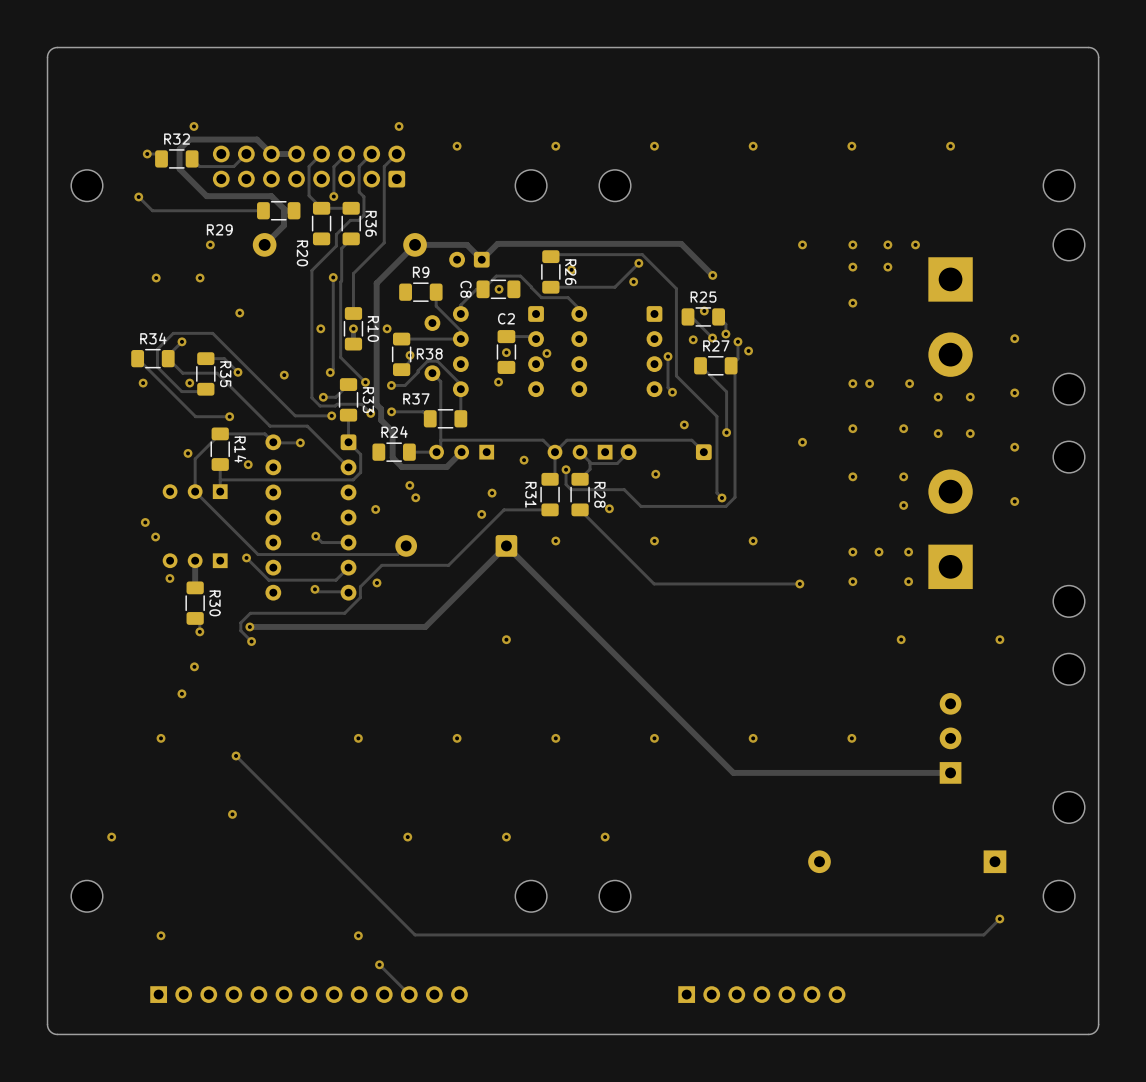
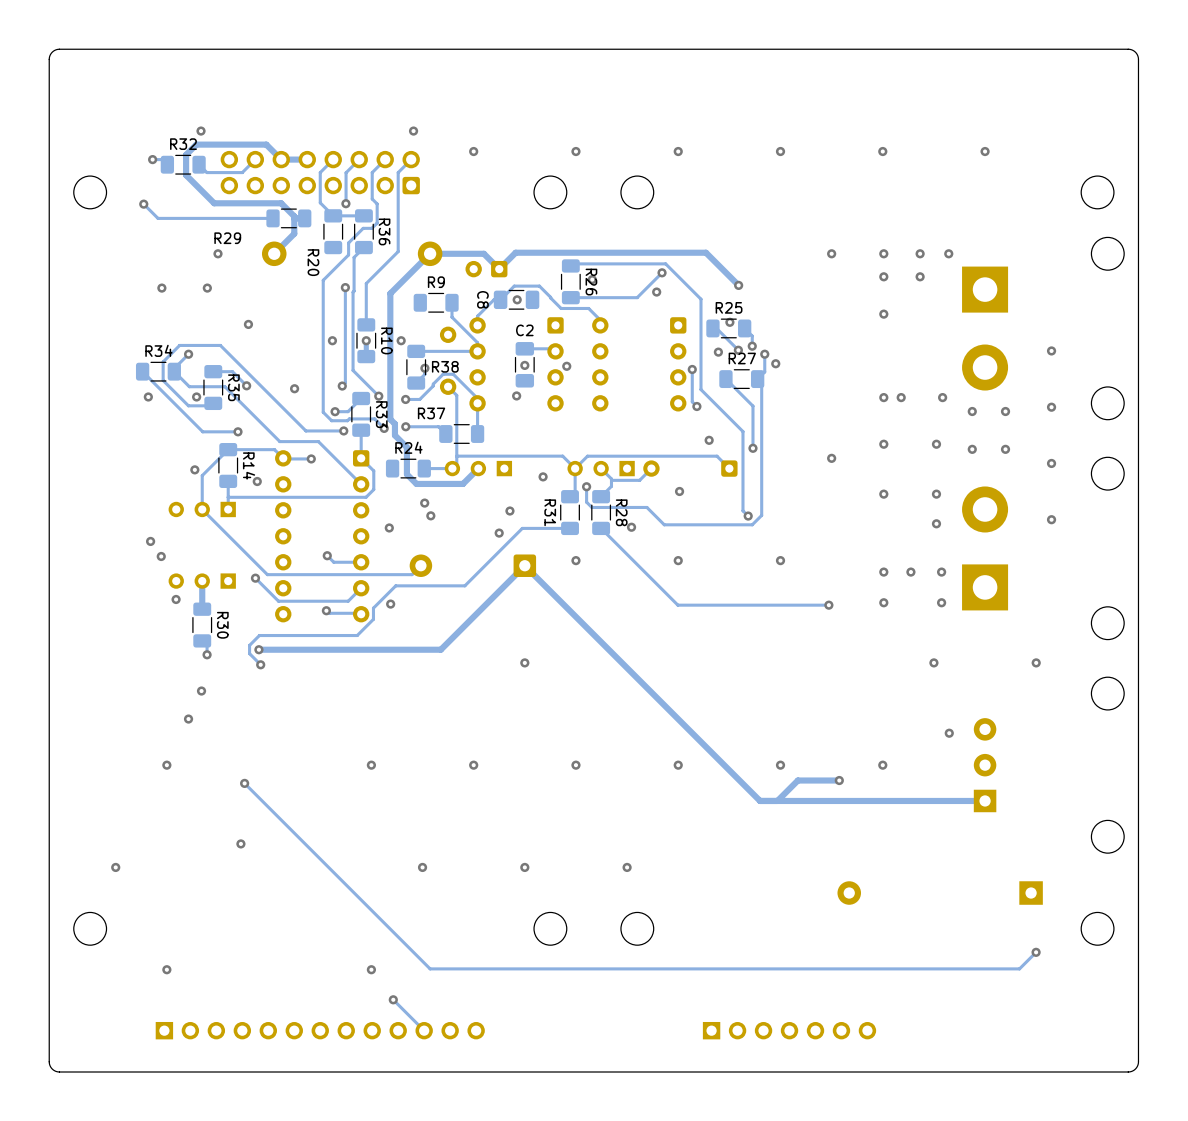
via: none -> (949, 733)
track: none -> (839, 780) (797, 780) (777, 800)
via: none -> (839, 780)

